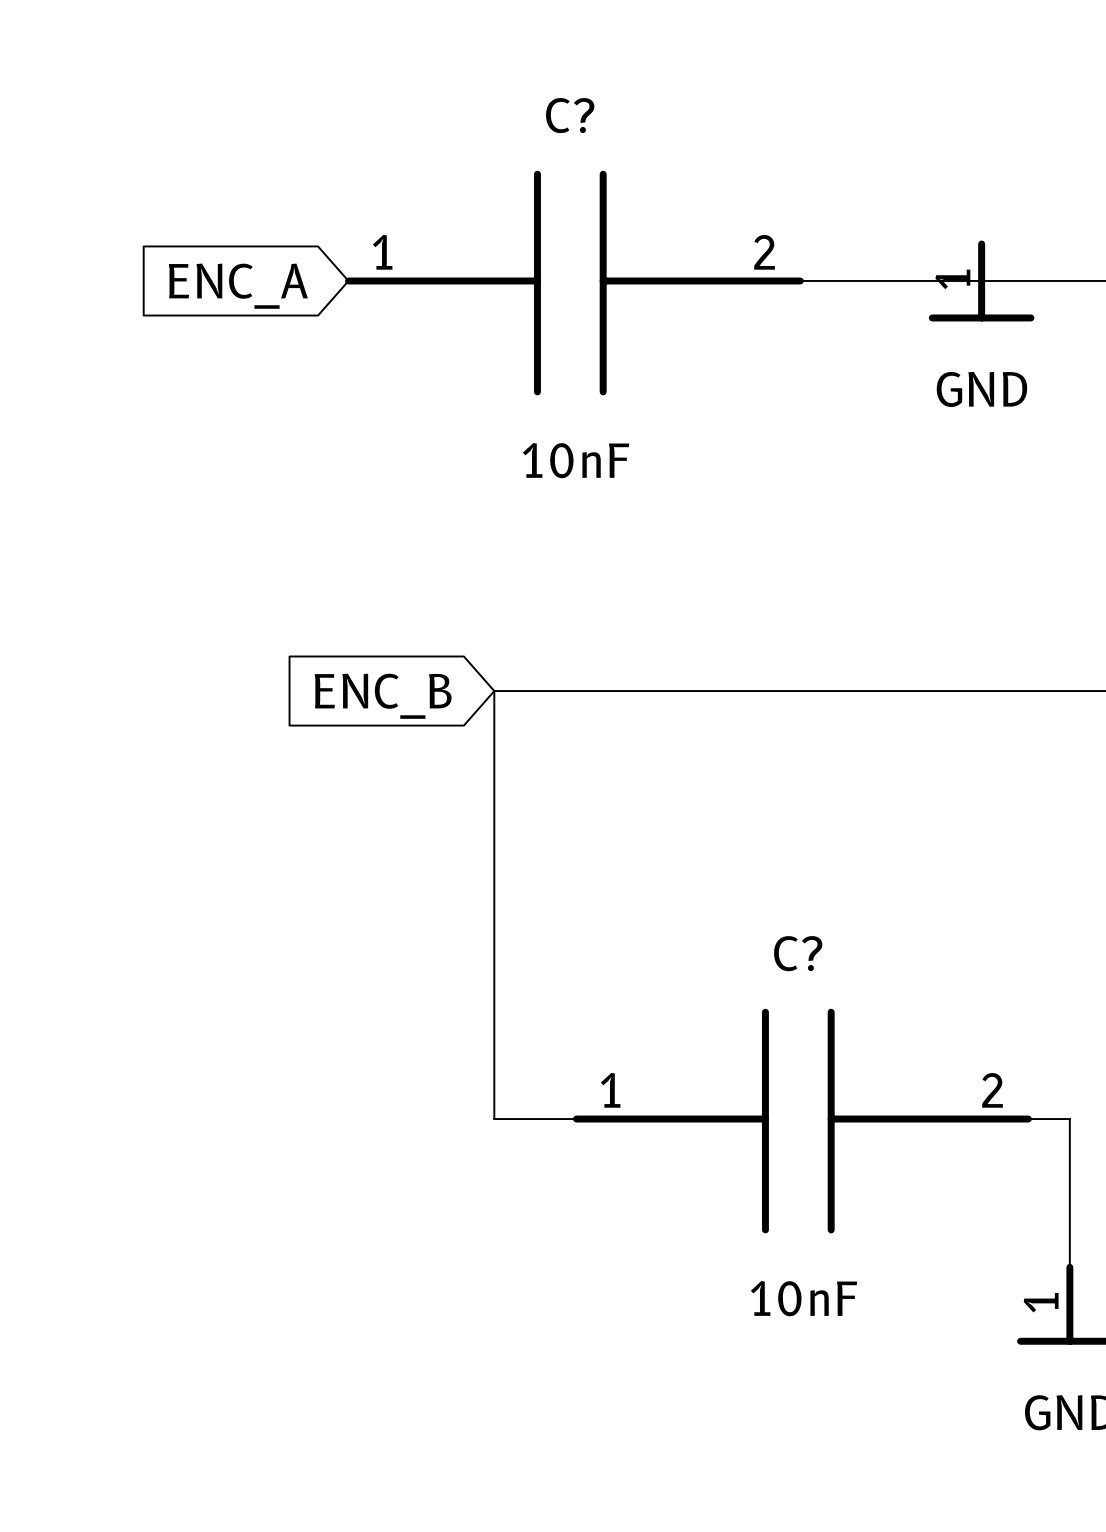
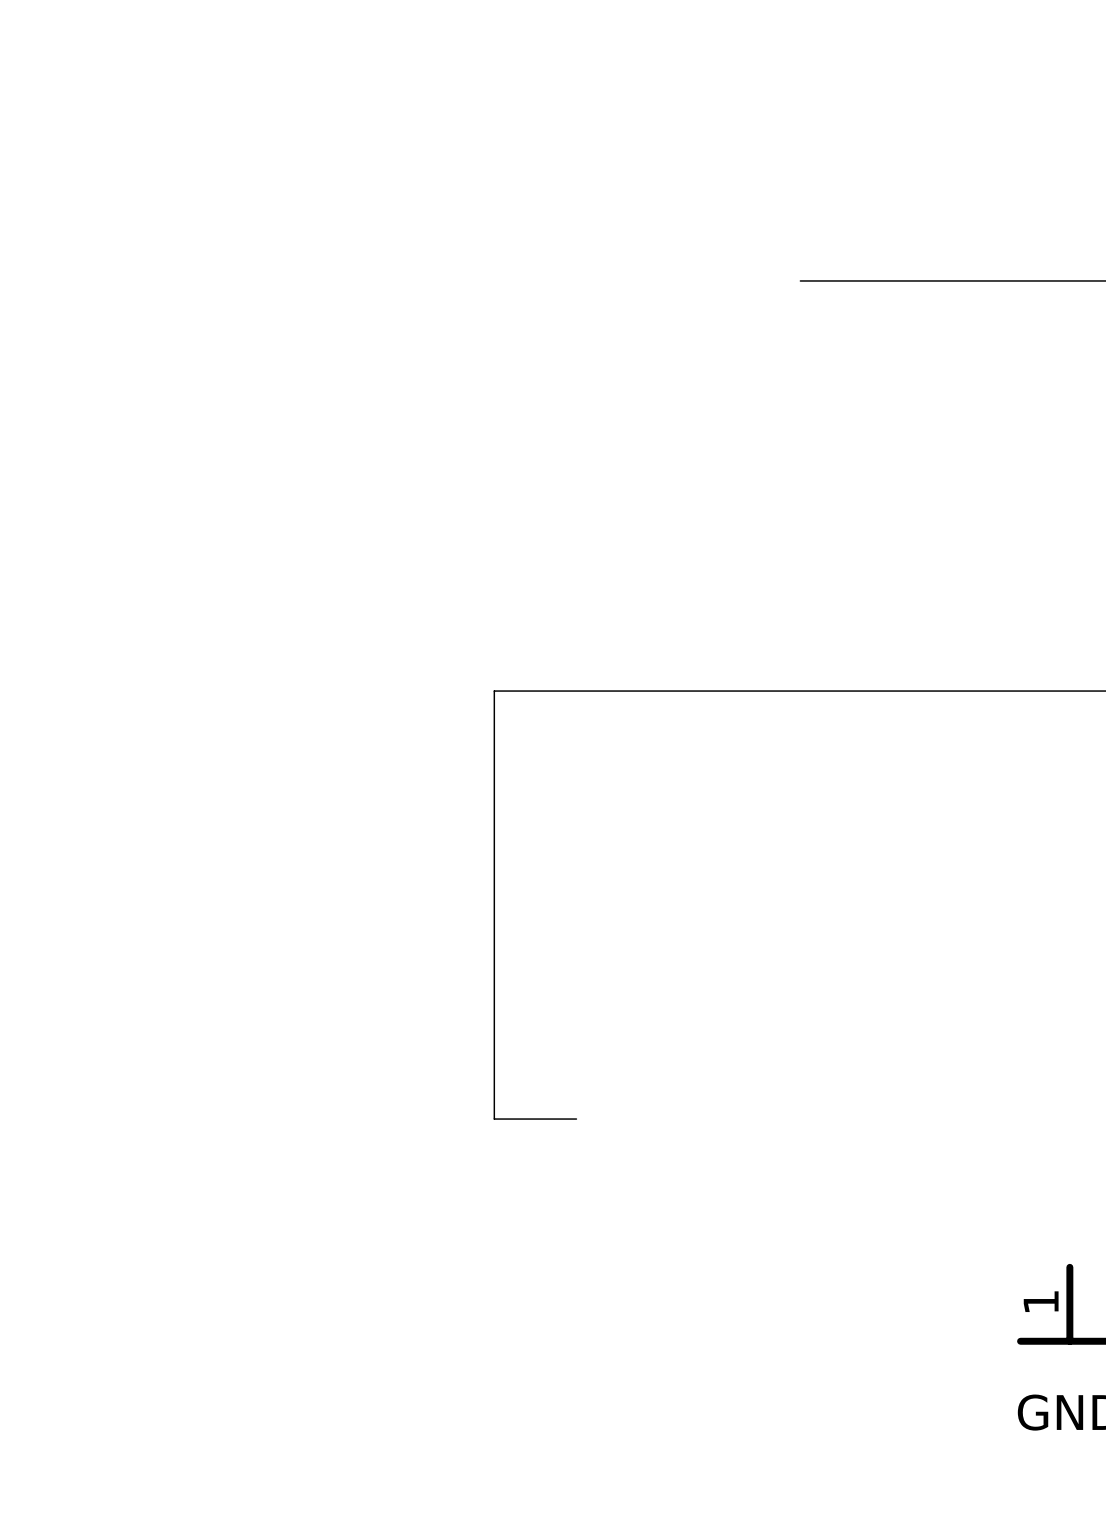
GND: (981, 280) -> none
C?: 10nF (574, 283) -> none
global label: ENC_A (238, 286) -> none
global label: ENC_B (383, 696) -> none
wire: (1028, 1119) (1069, 1119) (1069, 1304) -> none
C?: 10nF (802, 1121) -> none

